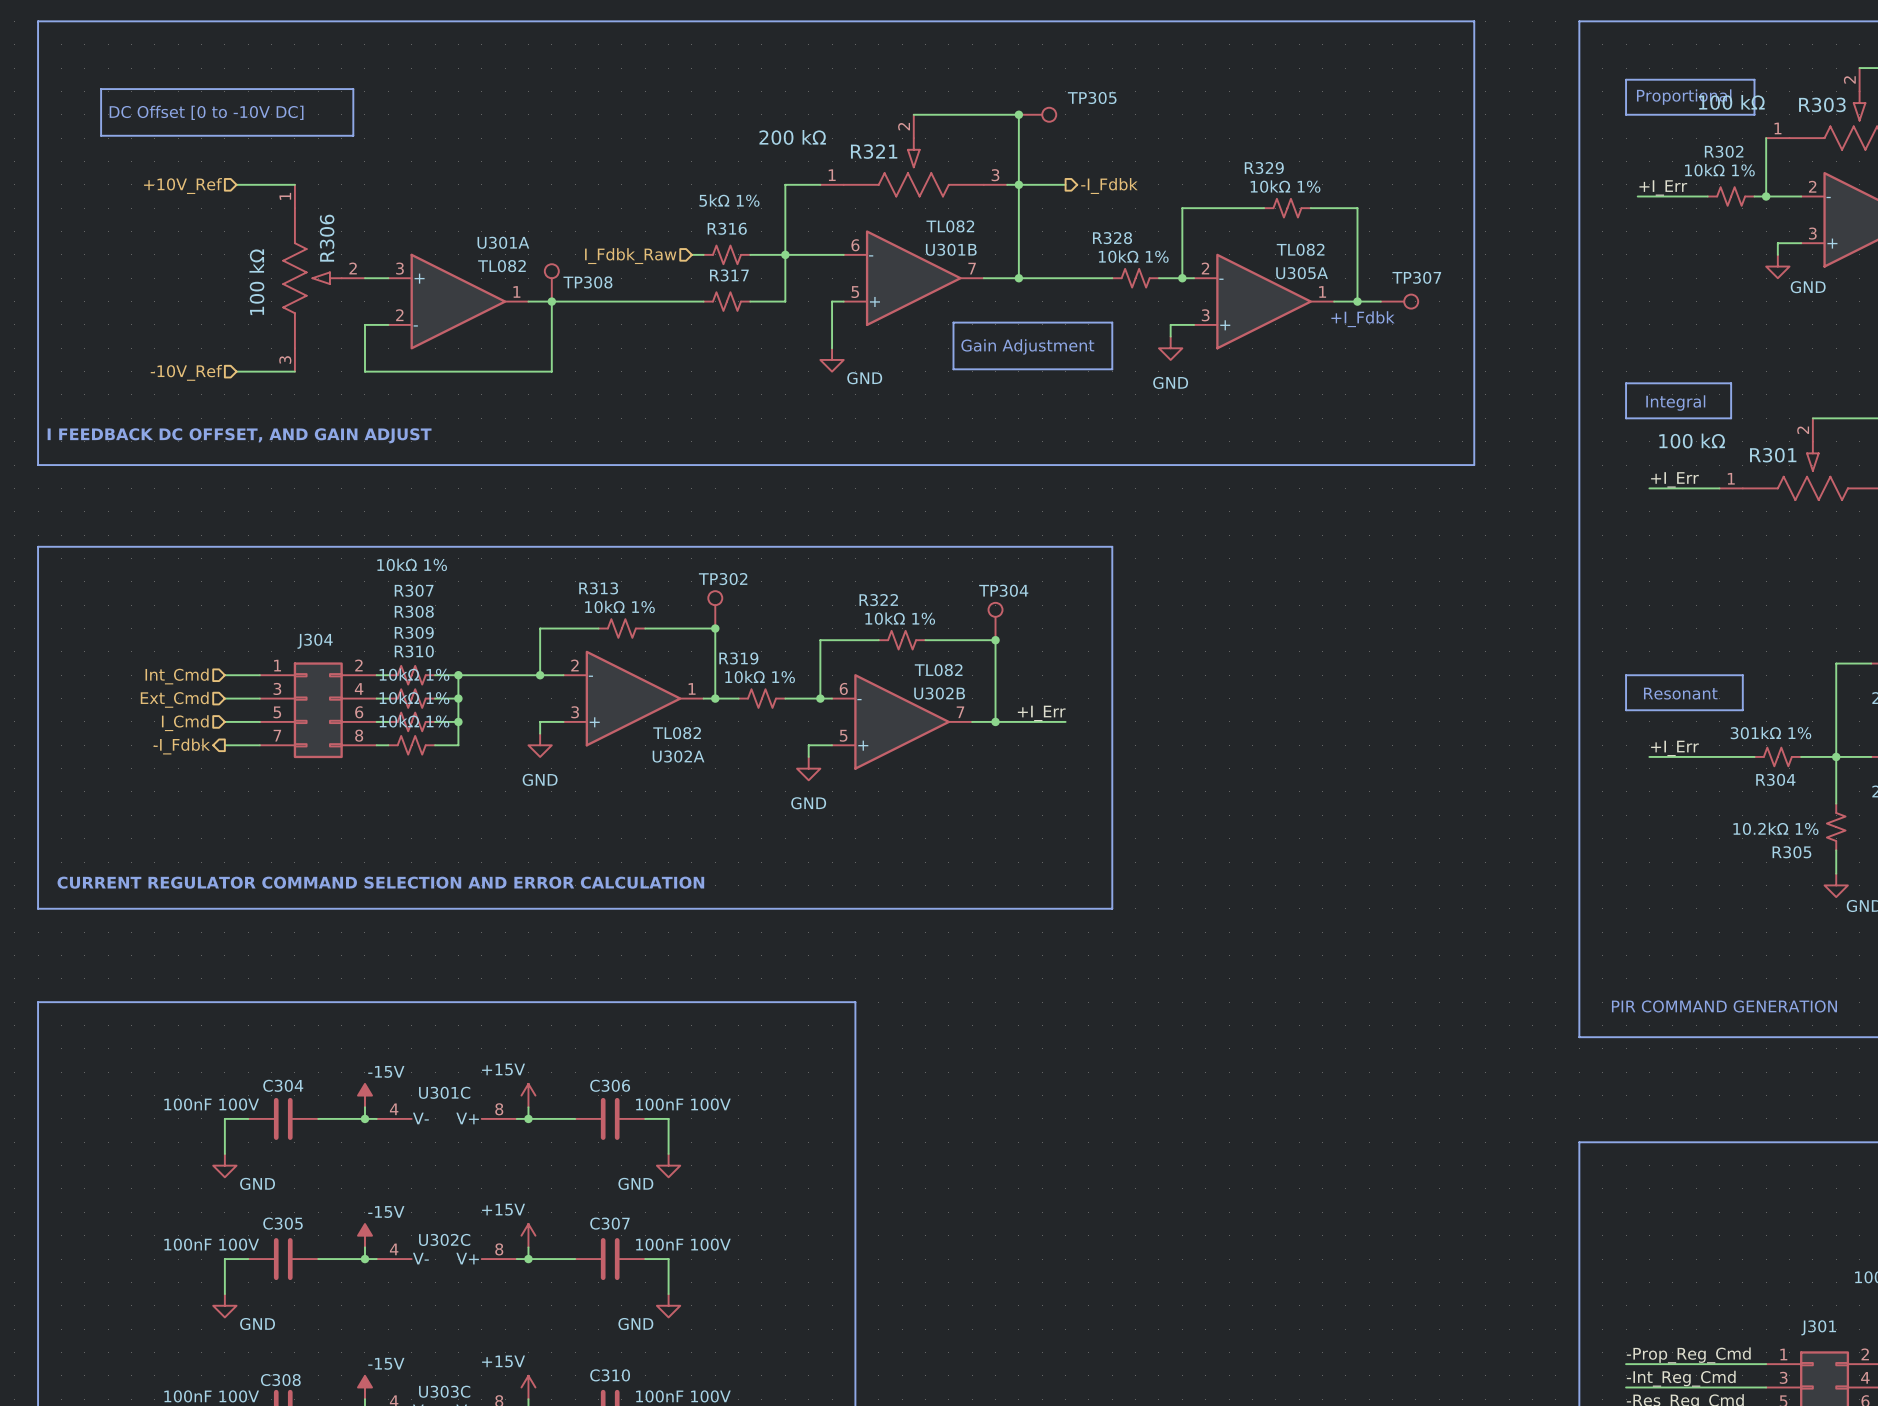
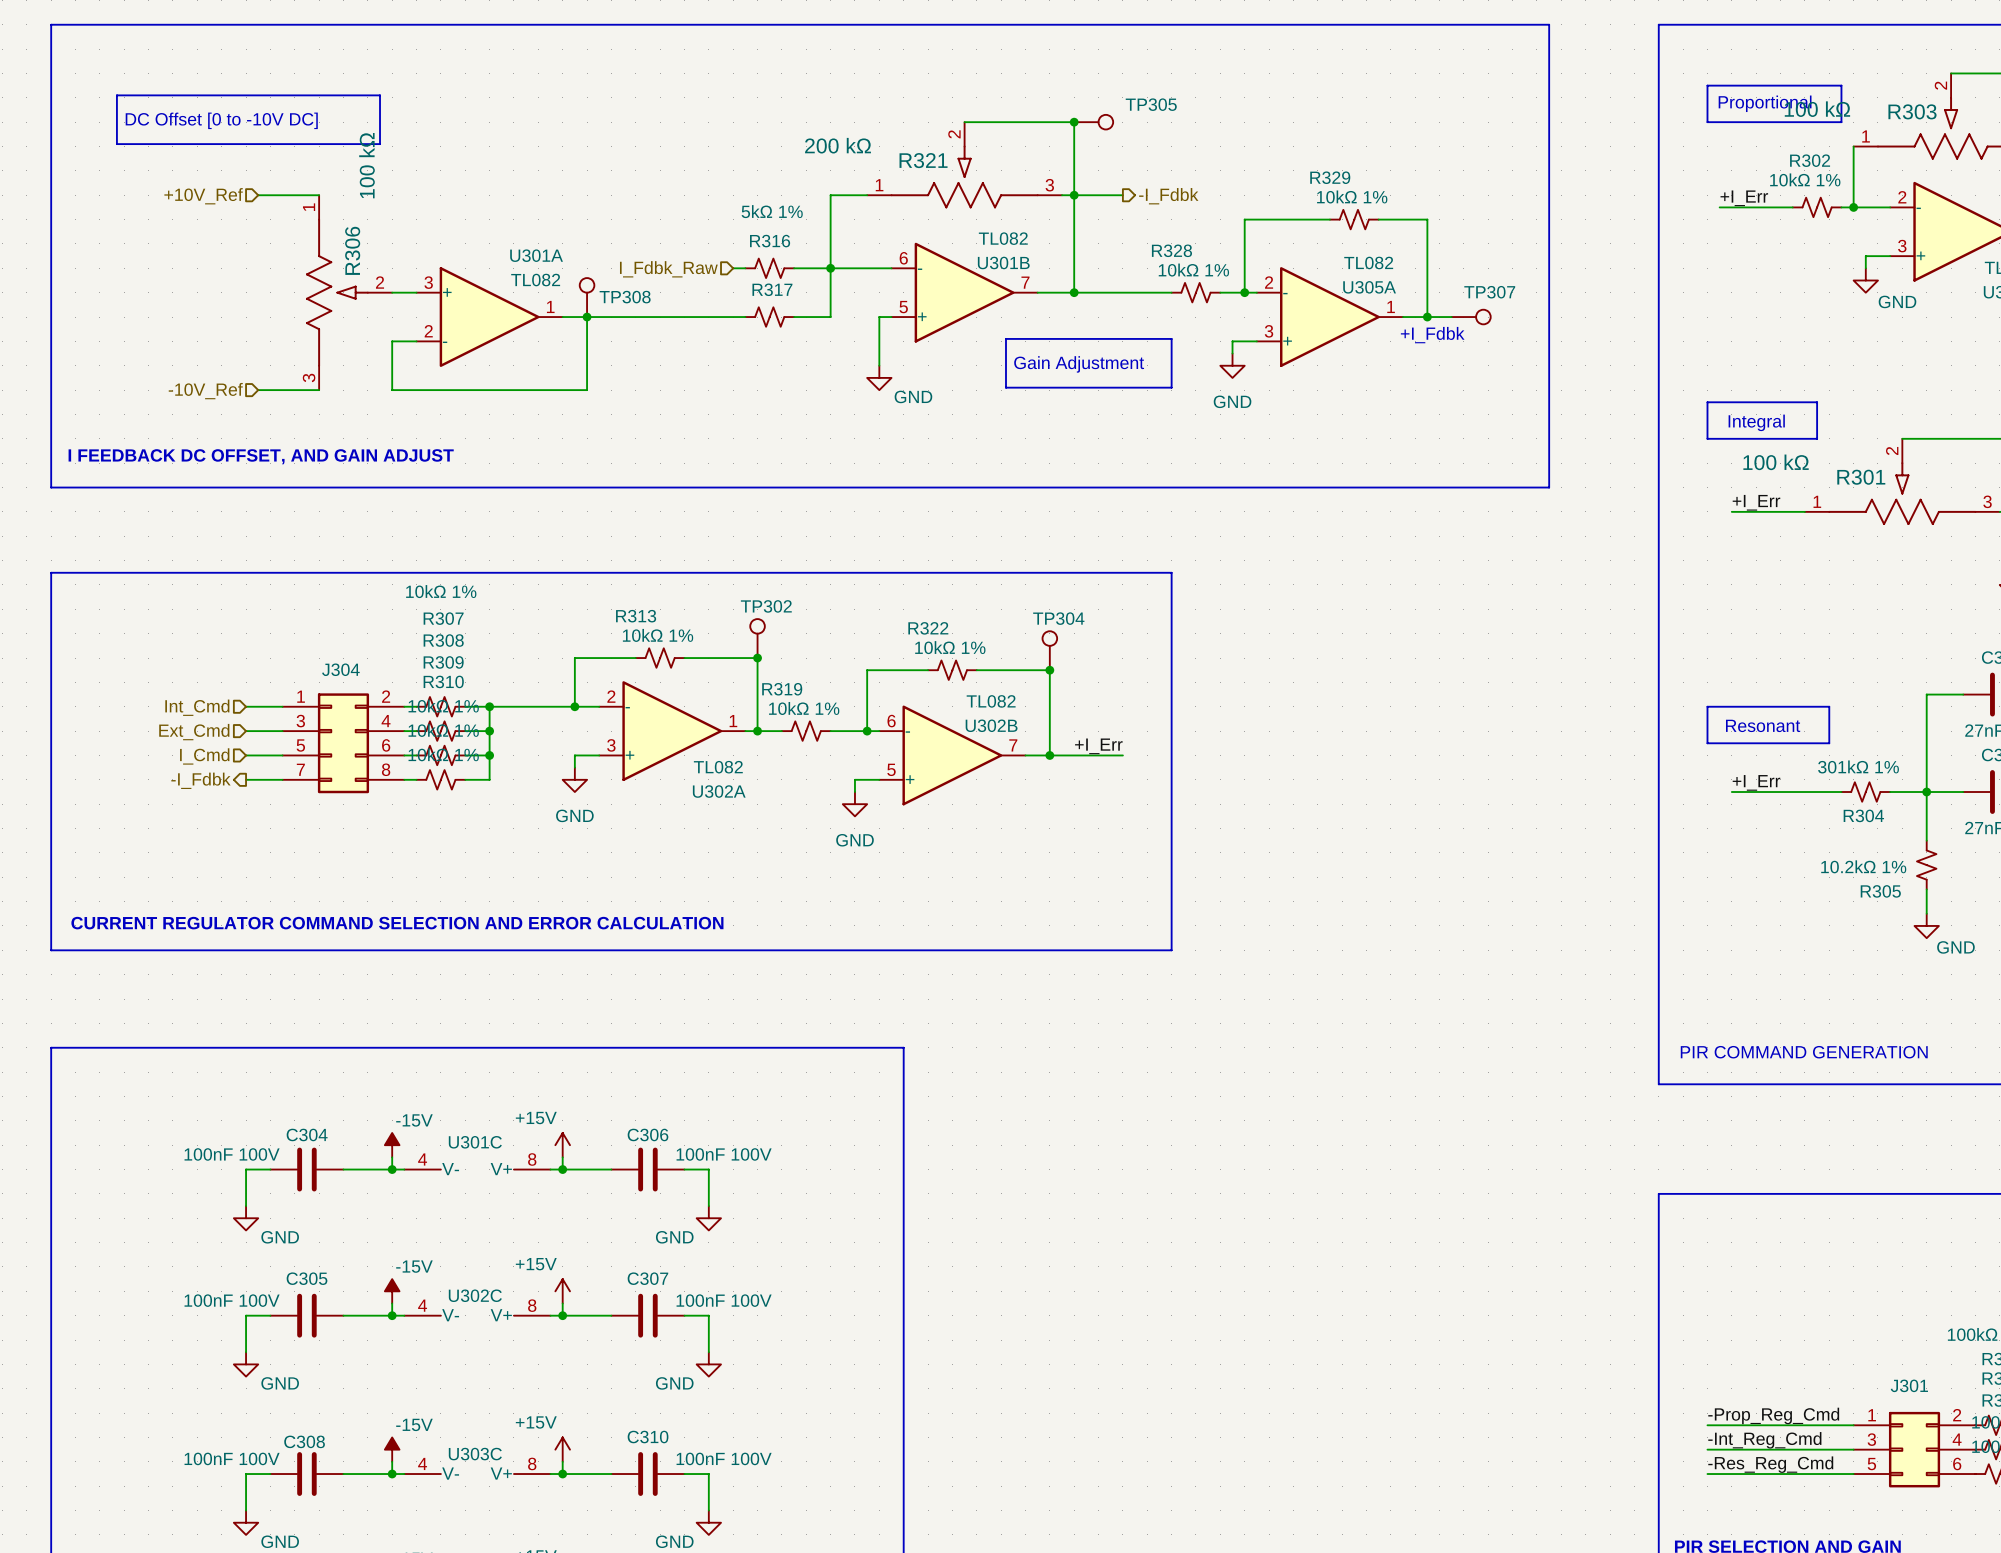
R306 value position: 100 kΩ (256, 282) -> 100 kΩ (366, 165)

